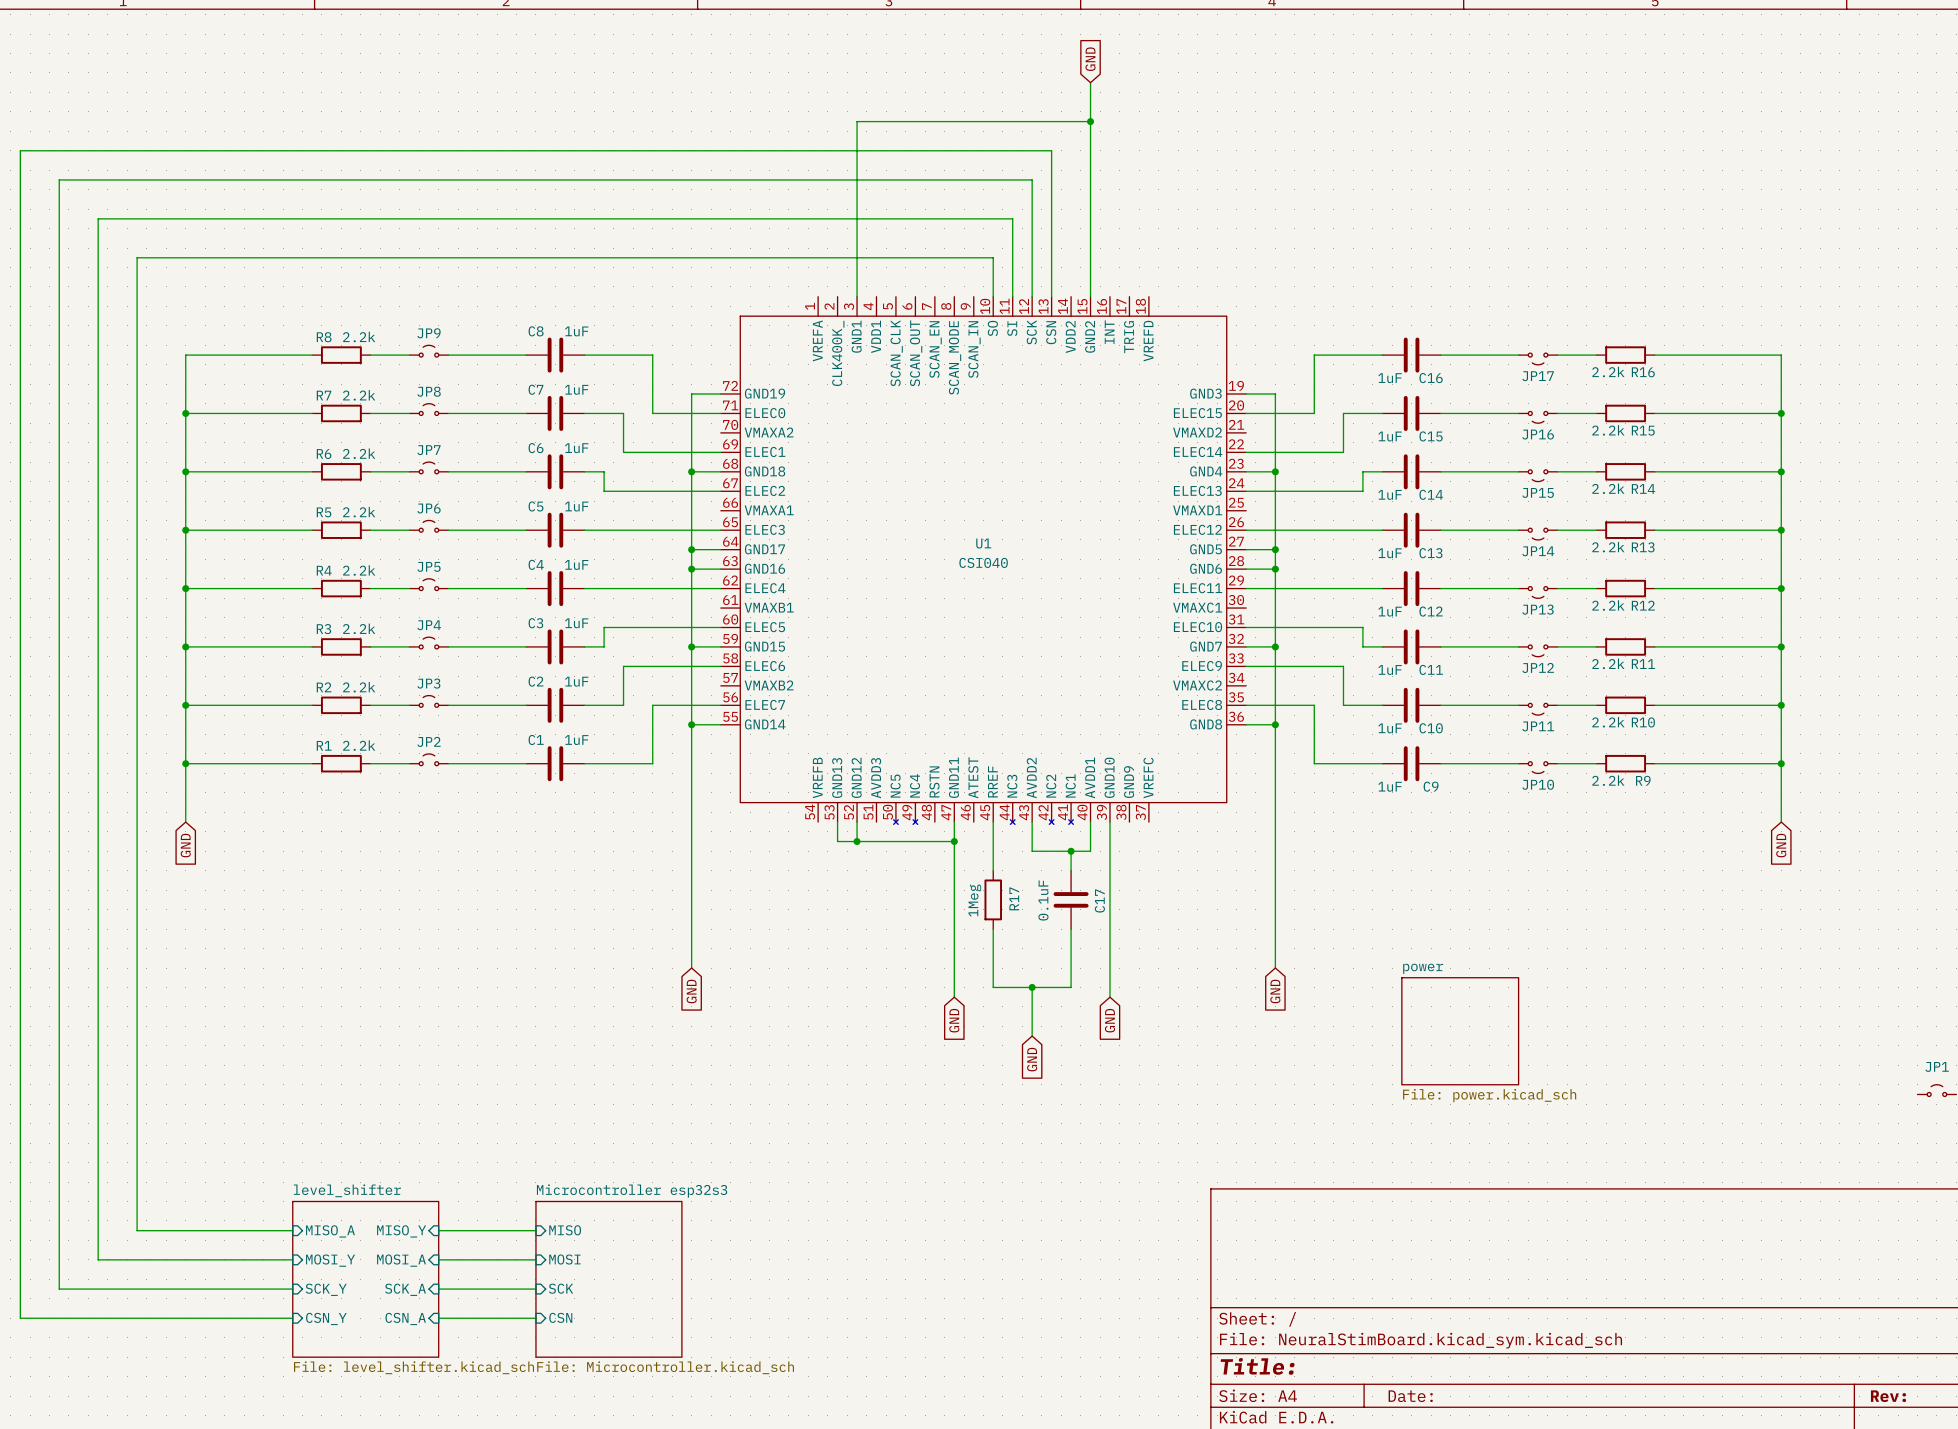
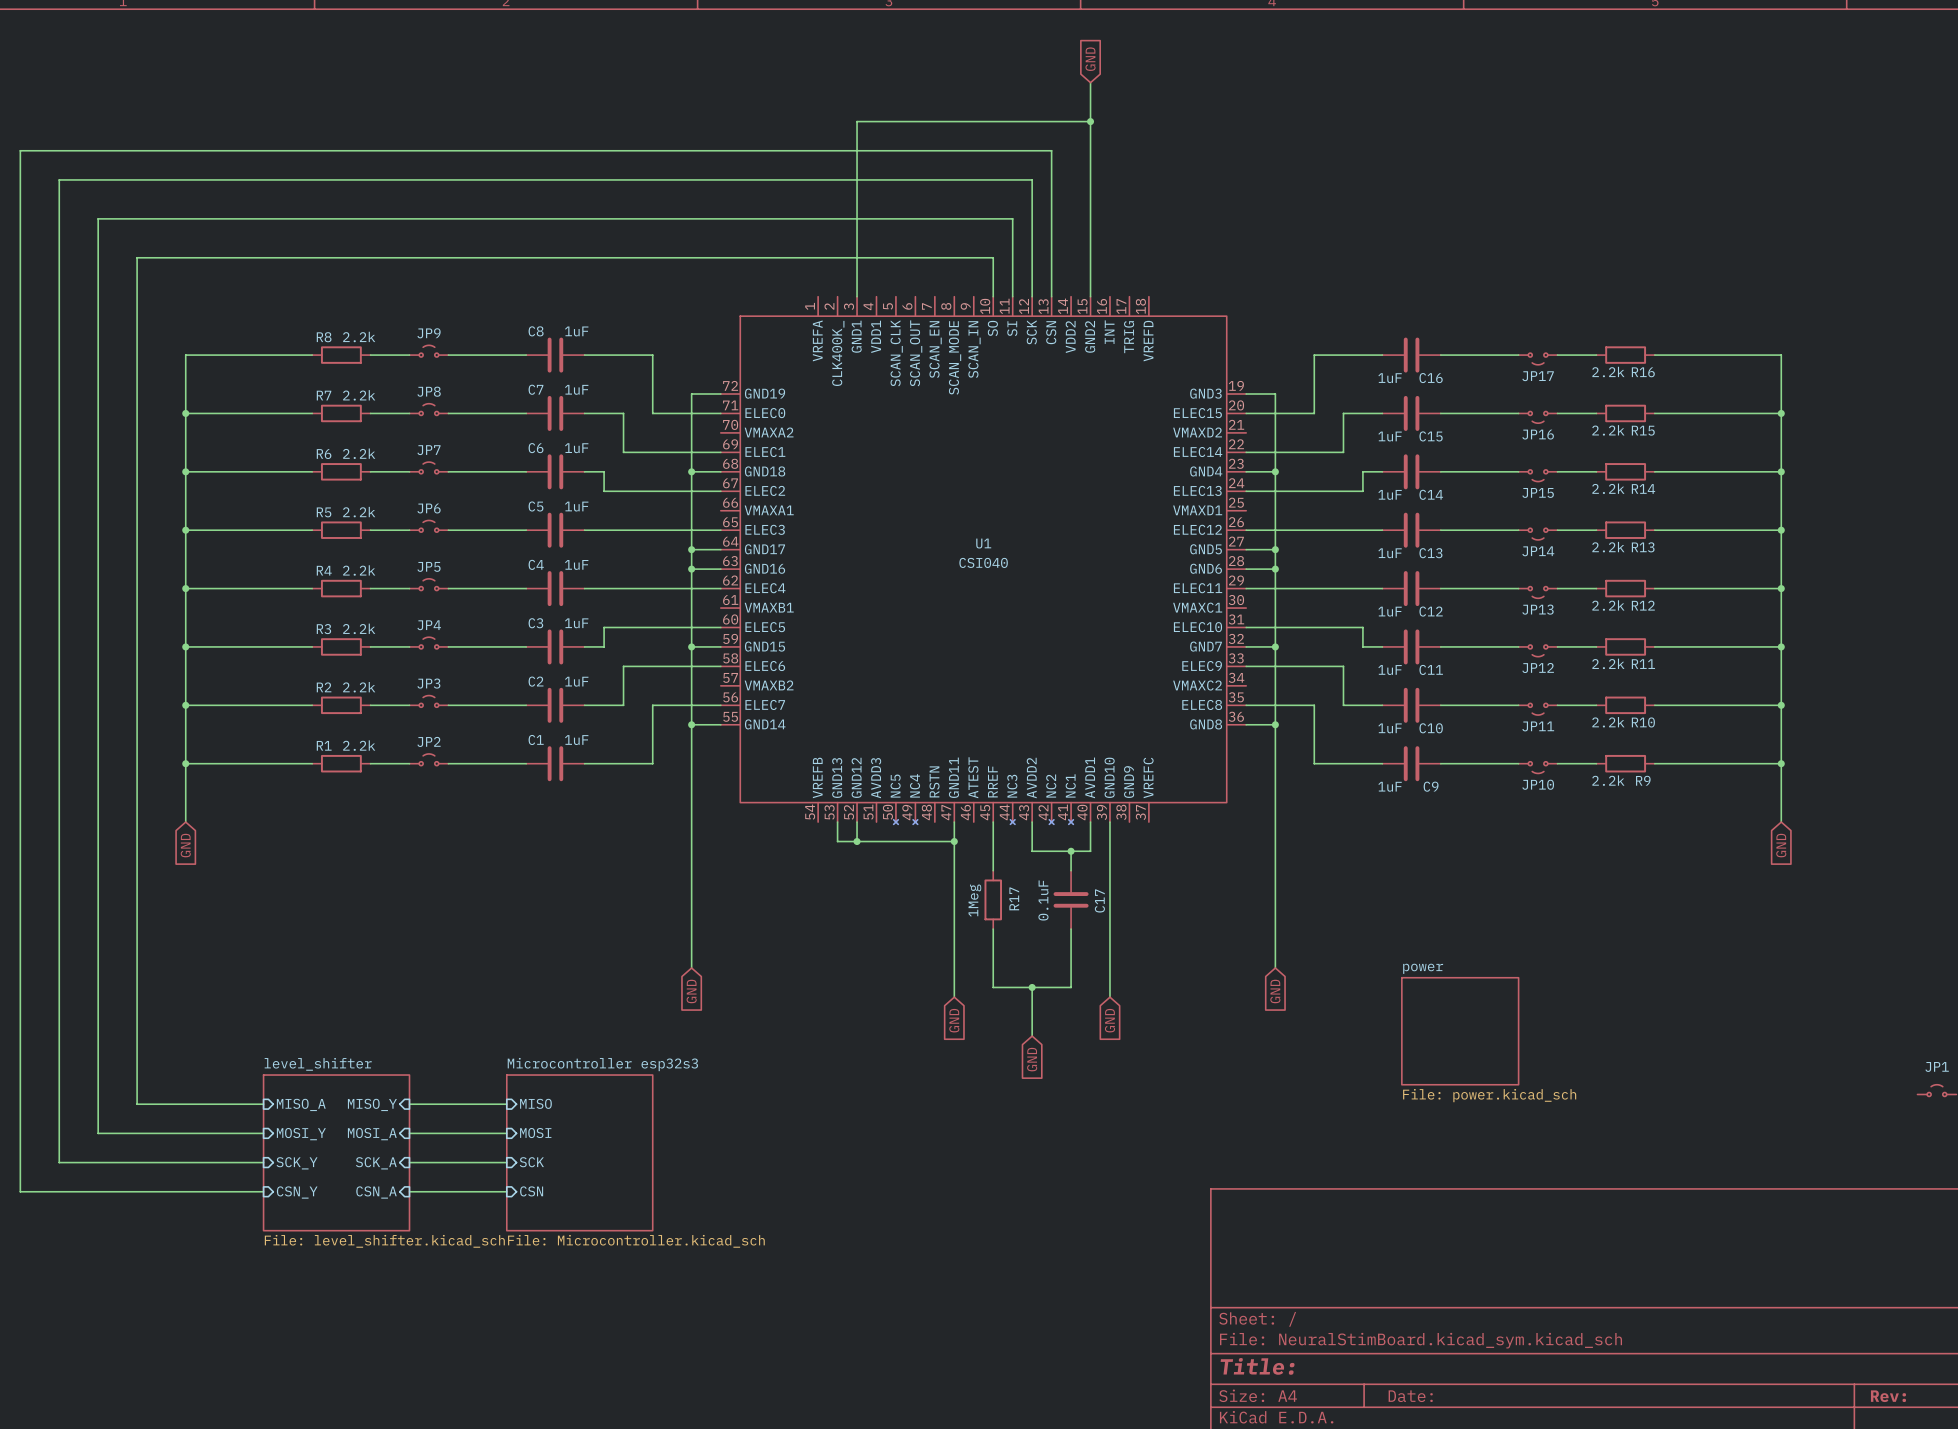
wire: (137, 1104) (137, 1230) (292, 1230) -> (137, 1104) (263, 1104)
wire: (98, 1133) (98, 1259) (292, 1259) -> (98, 1133) (263, 1133)
wire: (59, 1162) (59, 1289) (292, 1289) -> (59, 1162) (263, 1162)
wire: (20, 1191) (20, 1318) (292, 1318) -> (20, 1191) (263, 1191)
wire: (438, 1230) (535, 1230) -> (409, 1104) (506, 1104)
sheet pin position: MISO (565, 1230) -> MISO (535, 1103)
sheet pin position: MISO_A (330, 1231) -> MISO_A (301, 1104)
sheet pin position: MISO_Y (401, 1231) -> MISO_Y (372, 1104)
wire: (438, 1259) (535, 1259) -> (409, 1133) (506, 1133)
sheet pin position: MOSI (564, 1259) -> MOSI (535, 1133)
sheet pin position: MOSI_Y (330, 1260) -> MOSI_Y (301, 1134)
sheet pin position: MOSI_A (401, 1260) -> MOSI_A (372, 1134)
sheet level_shifter position: (365, 1279) -> (336, 1152)
sheet Microcontroller esp32s3 position: (608, 1279) -> (579, 1152)
sheet pin position: SCK (561, 1288) -> SCK (531, 1162)
sheet pin position: SCK_Y (326, 1289) -> SCK_Y (297, 1163)
sheet pin position: SCK_A (405, 1289) -> SCK_A (376, 1163)
wire: (438, 1289) (535, 1289) -> (409, 1162) (506, 1162)
sheet pin position: CSN (560, 1317) -> CSN (531, 1191)
sheet pin position: CSN_Y (326, 1318) -> CSN_Y (297, 1192)
sheet pin position: CSN_A (405, 1318) -> CSN_A (376, 1192)
wire: (438, 1318) (535, 1318) -> (409, 1191) (506, 1191)

